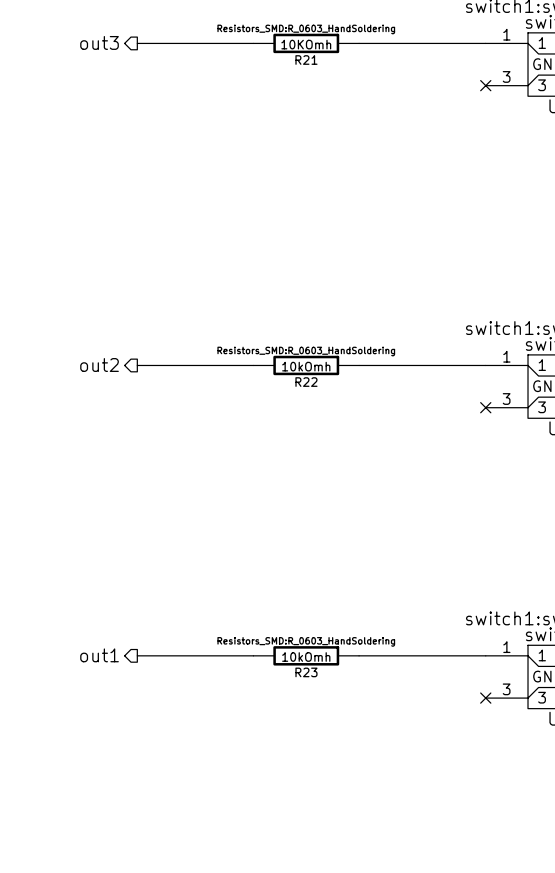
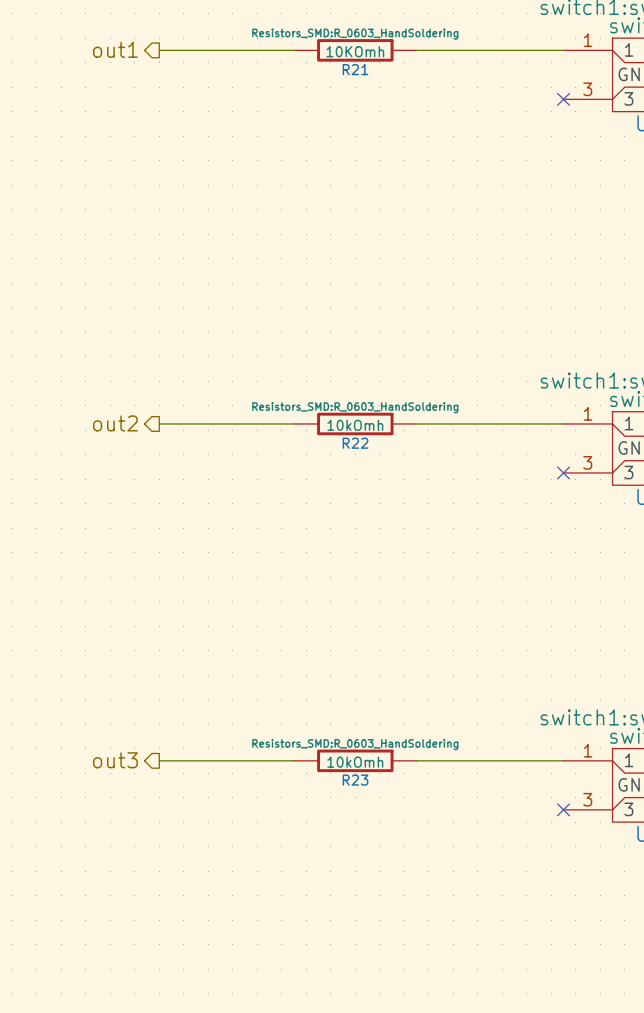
hierarchical label: out3 (99, 42) -> out1 (115, 49)
hierarchical label: out1 (99, 655) -> out3 (115, 760)

